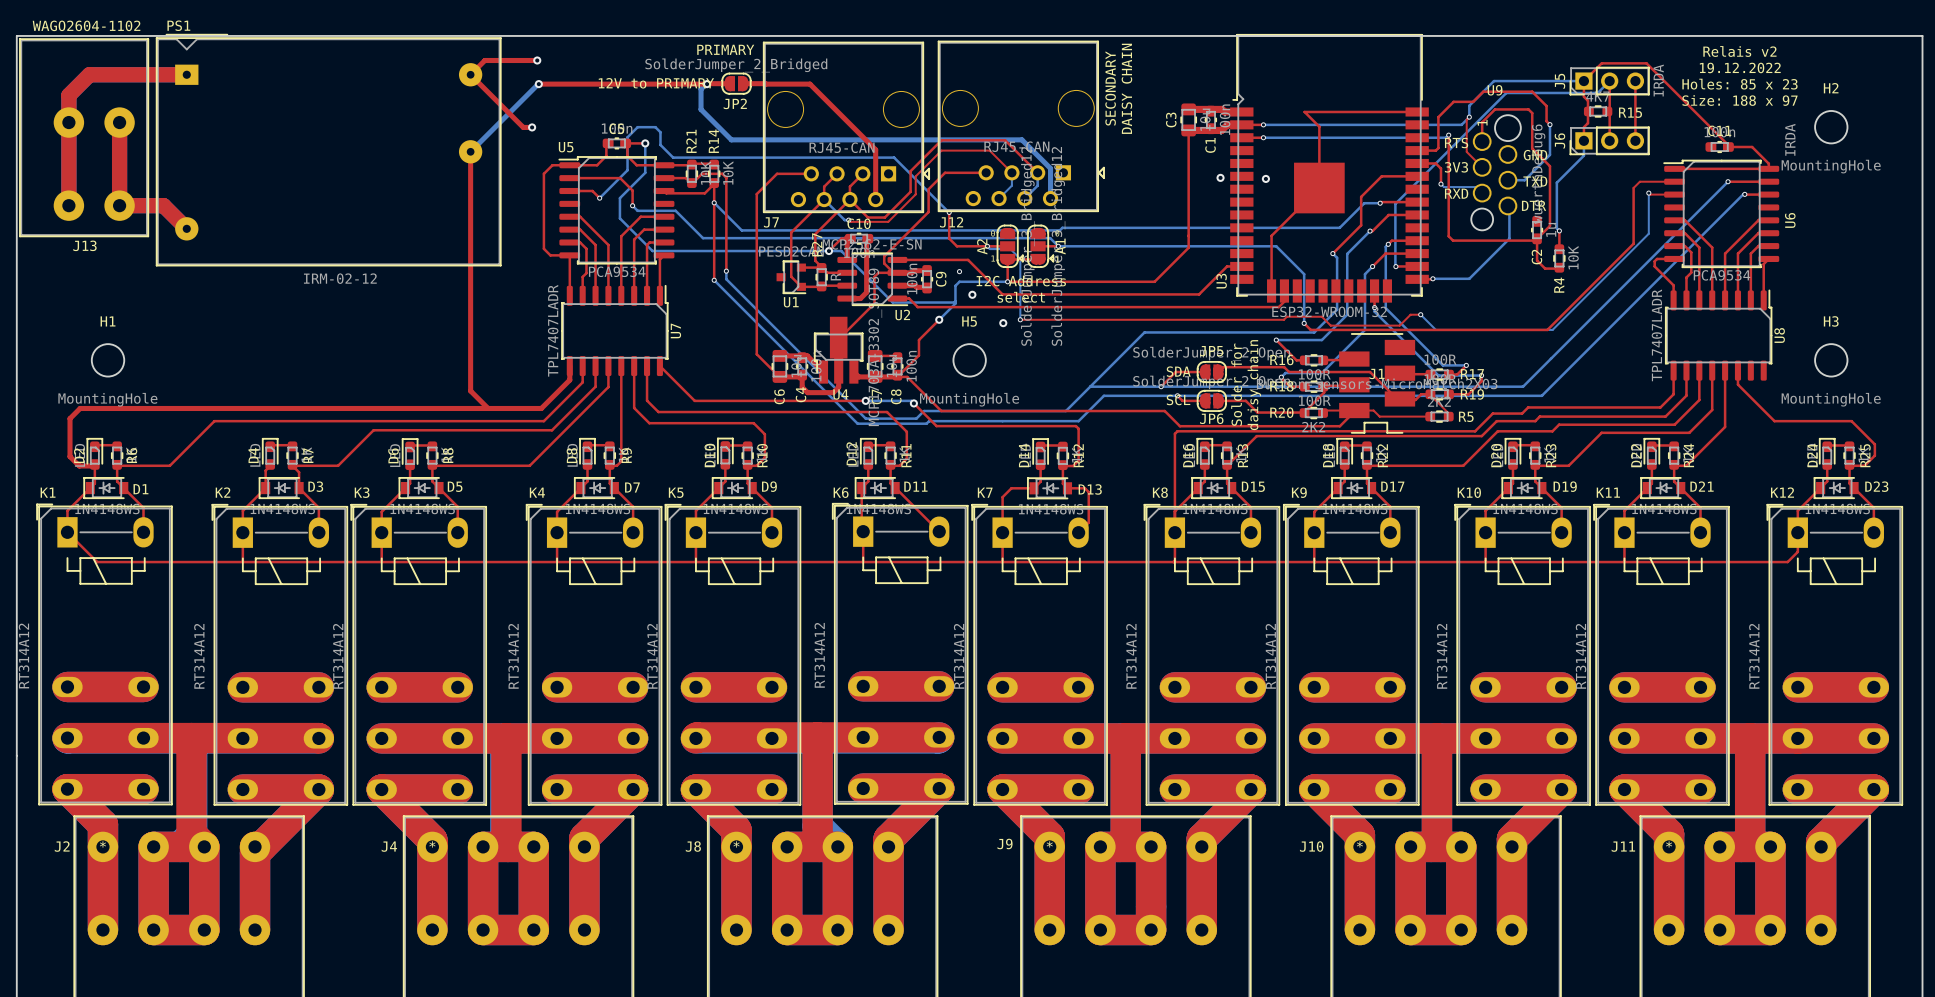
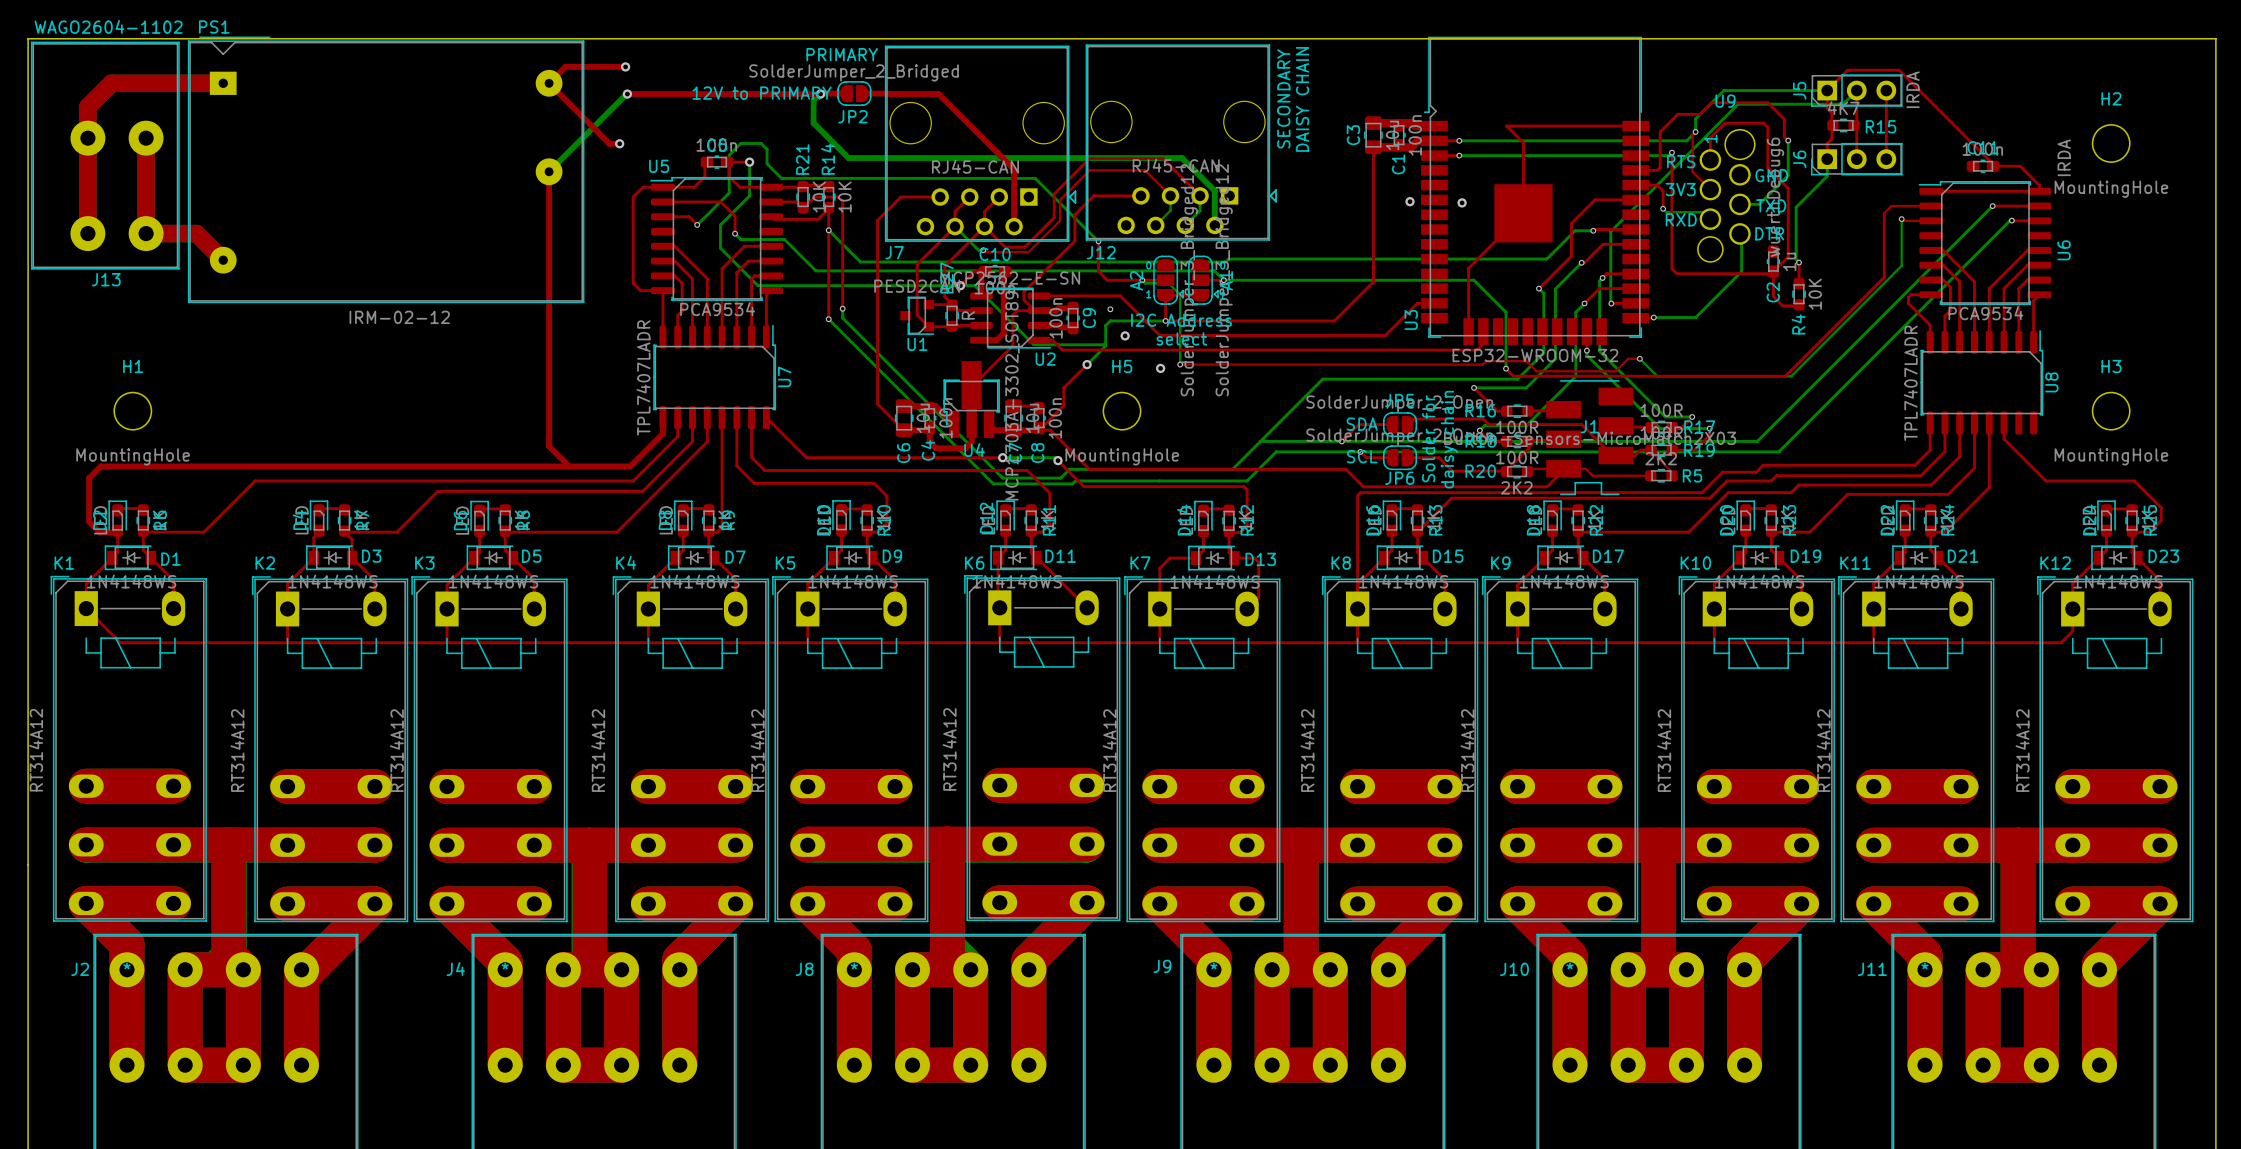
text: Relais v2 (1739, 51) -> none
text: 19.12.2022 (1740, 67) -> none
text: Holes: 85 x 23 (1739, 84) -> none
text: Size: 188 x 97 (1739, 100) -> none

